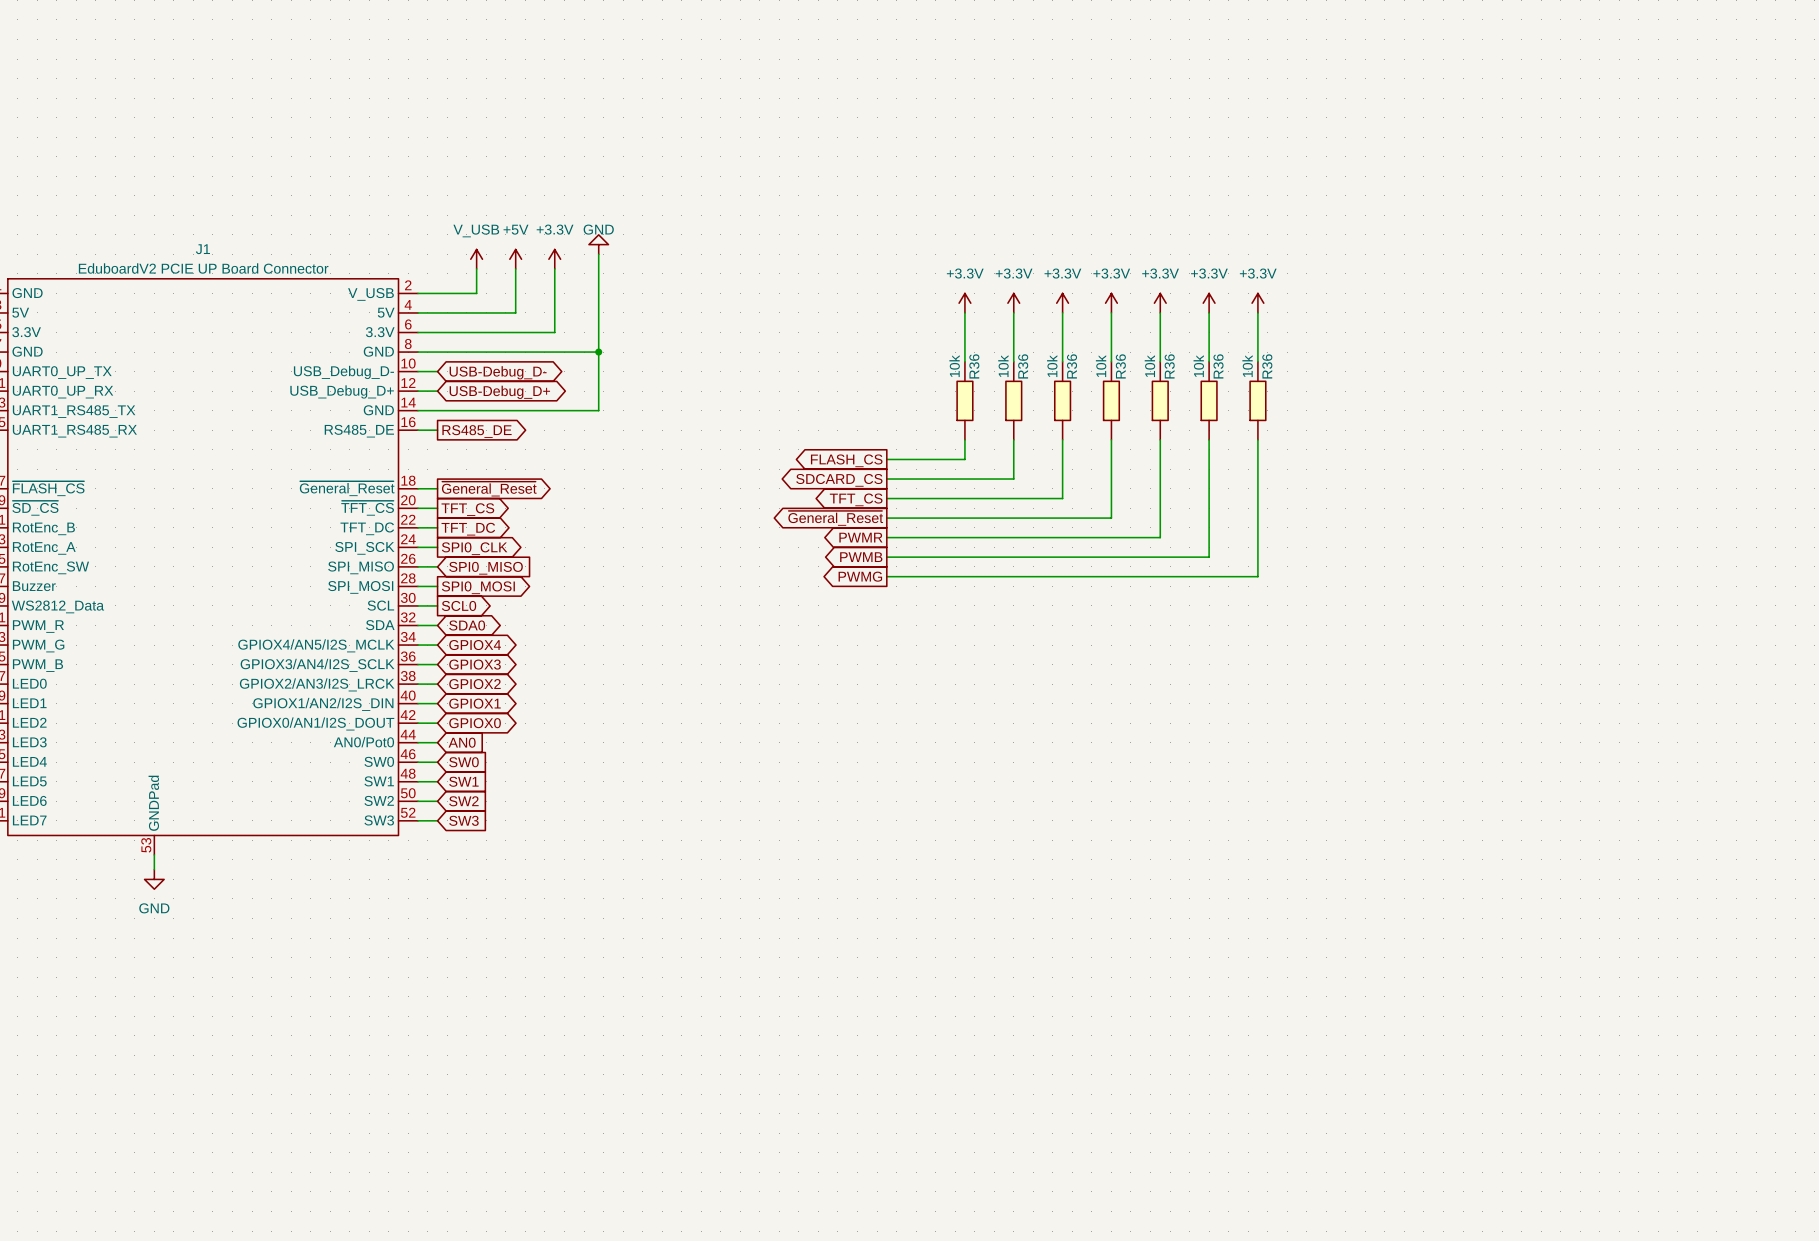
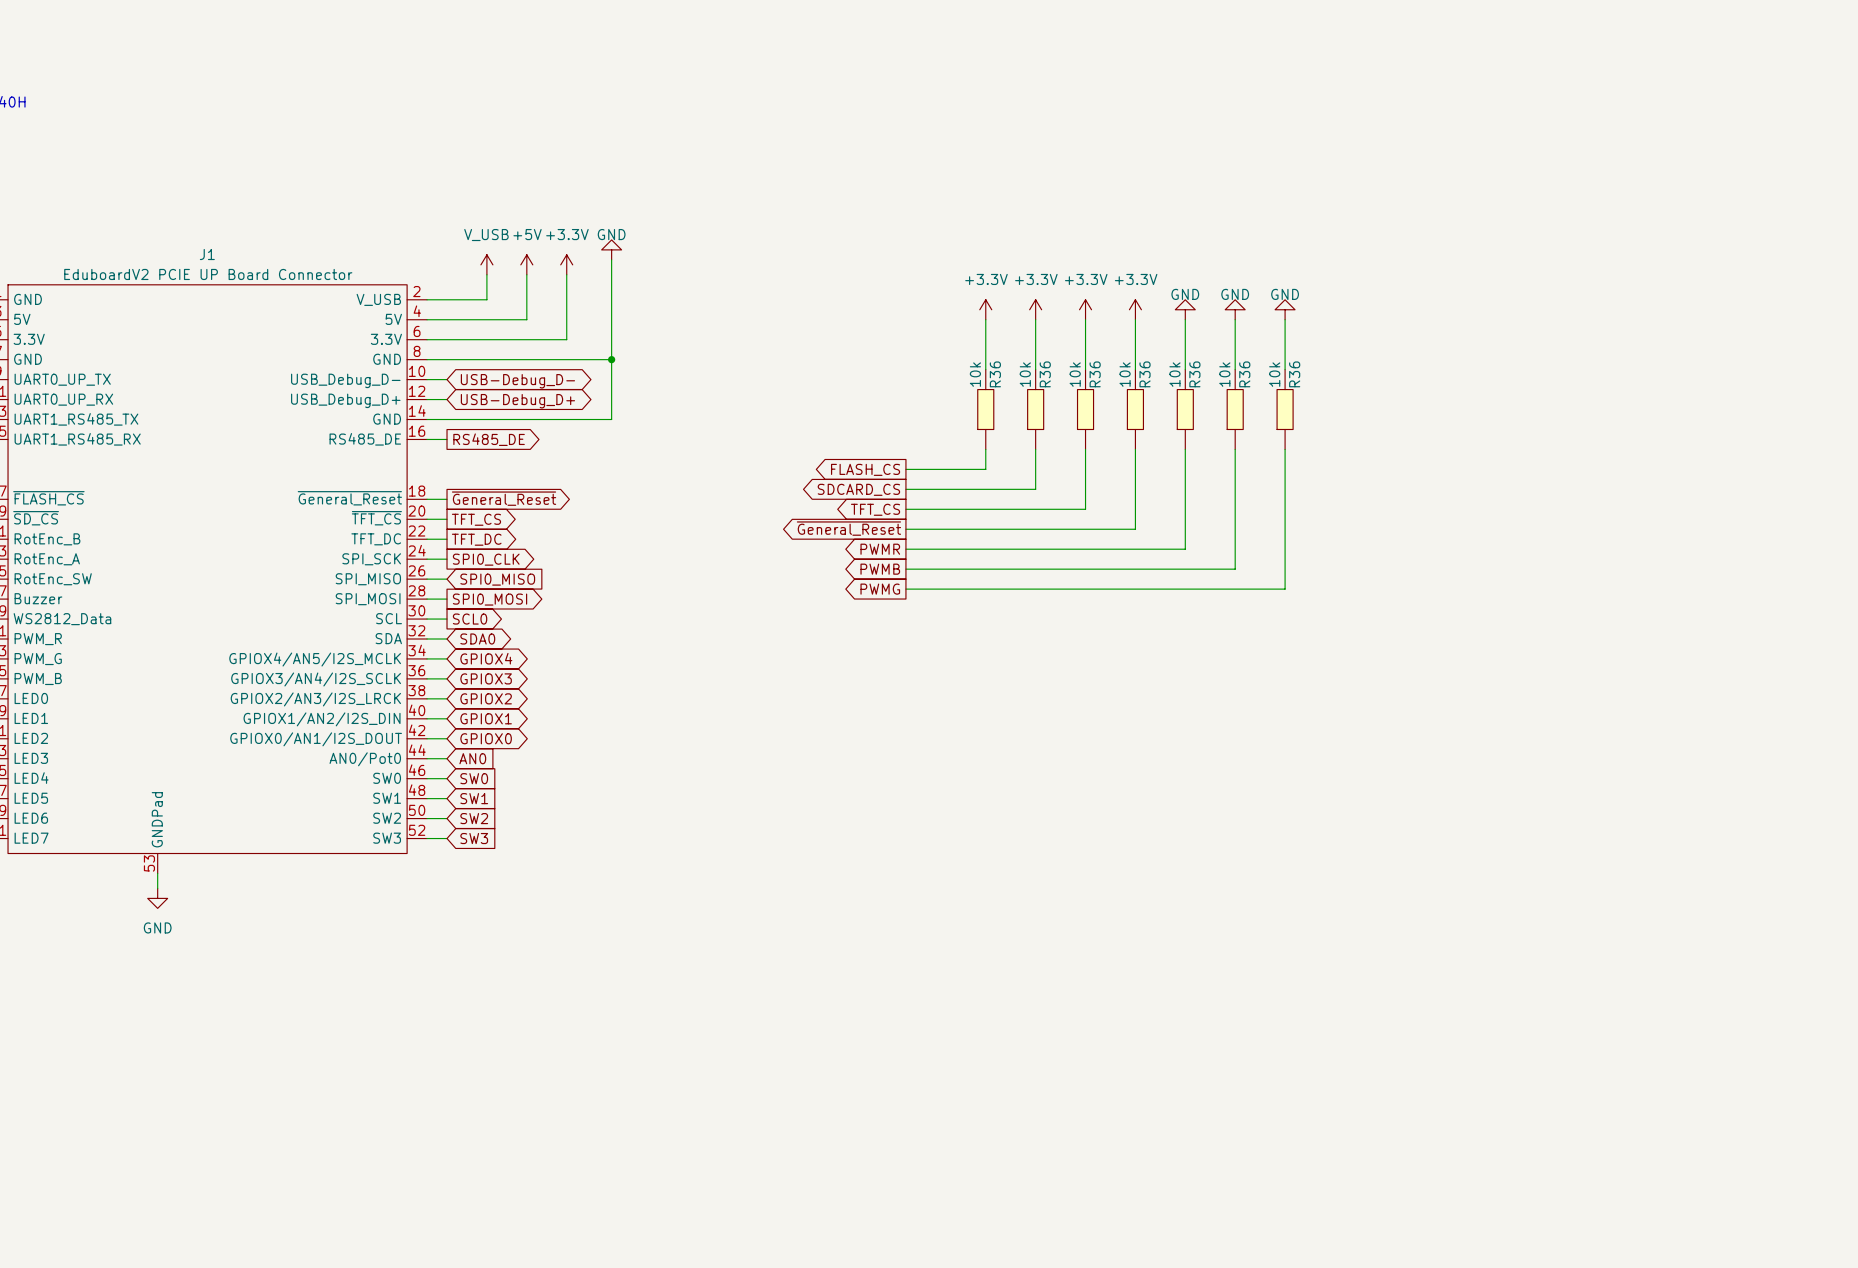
power symbol: +3.3V (1160, 303) -> GND (1185, 309)
power symbol: +3.3V (1209, 303) -> GND (1235, 309)
power symbol: +3.3V (1257, 303) -> GND (1285, 309)

